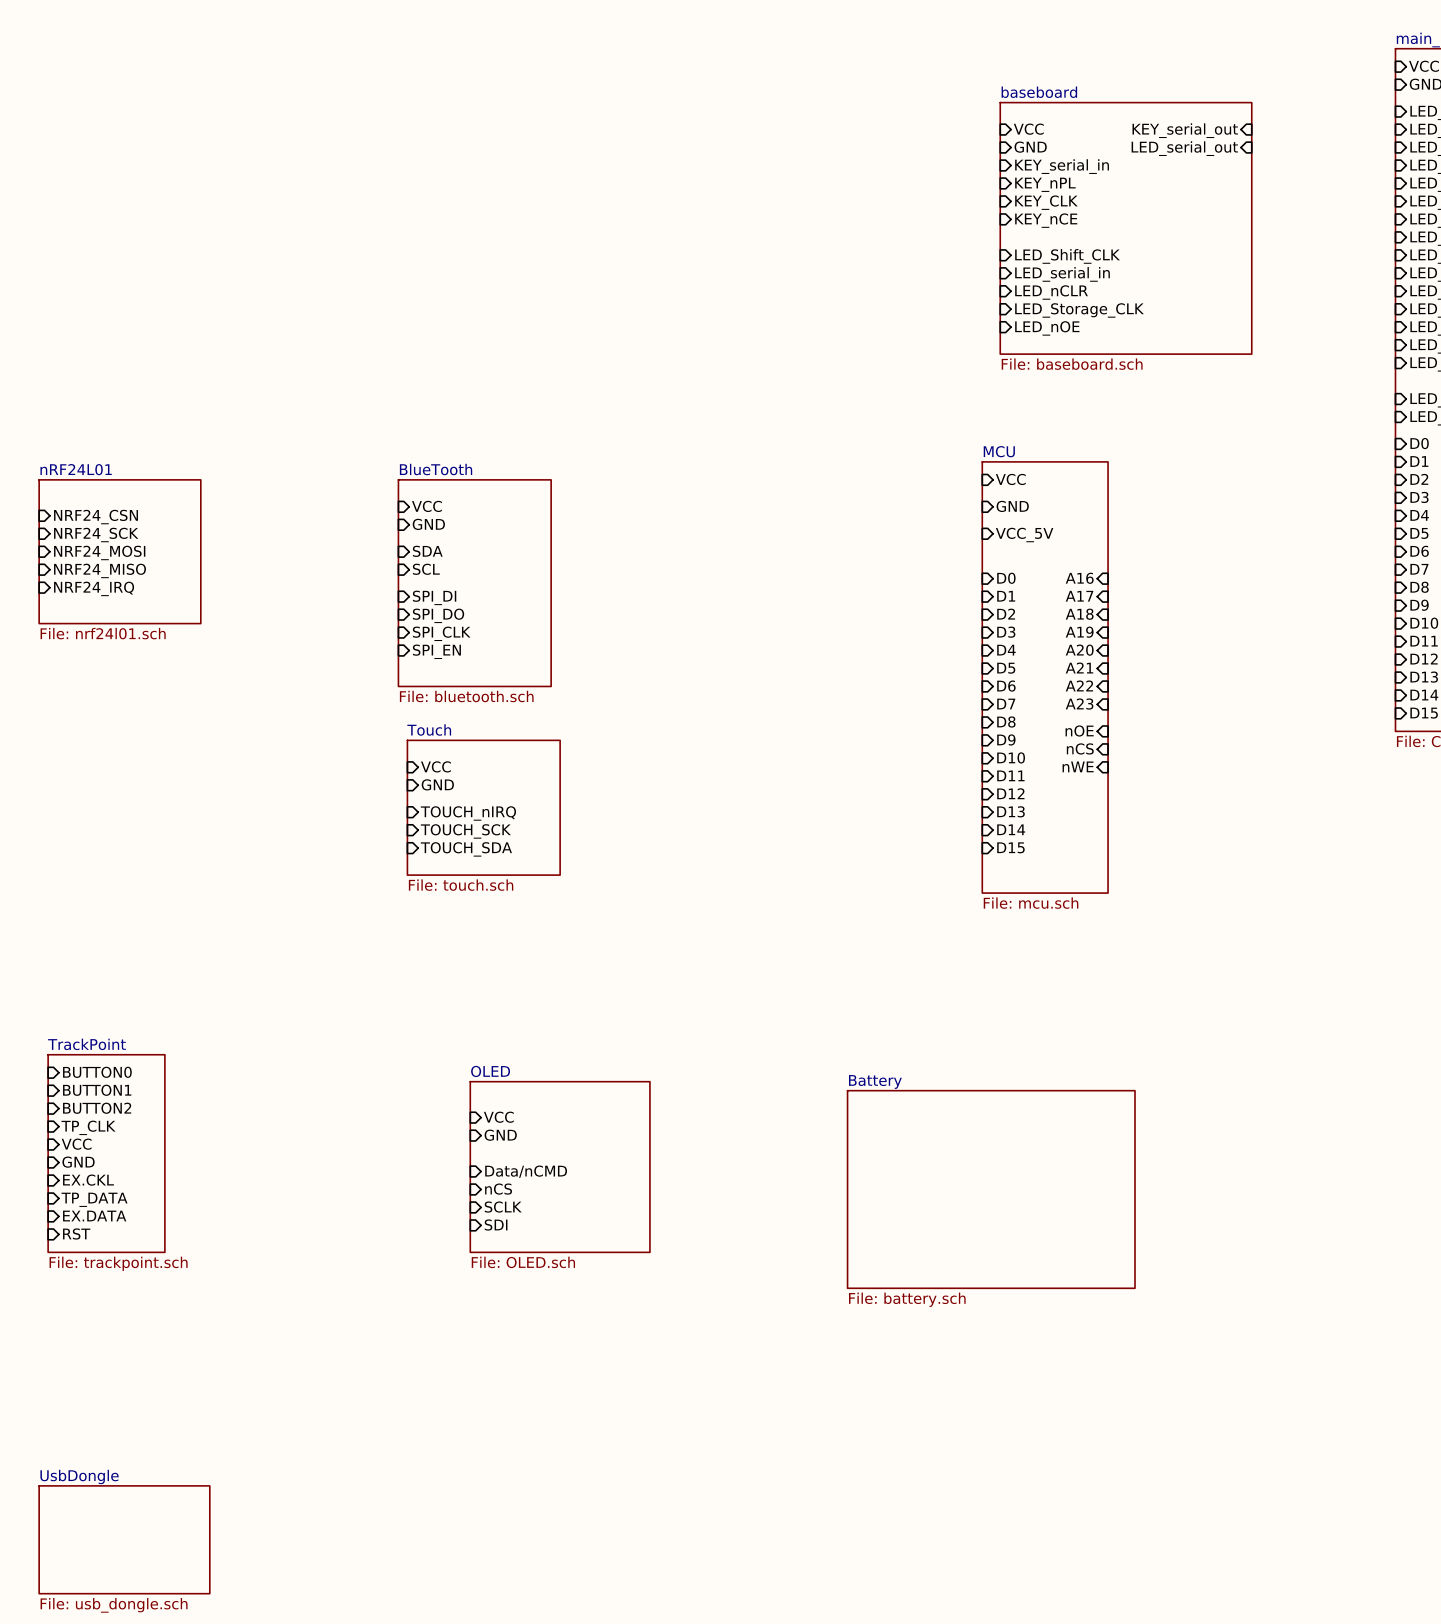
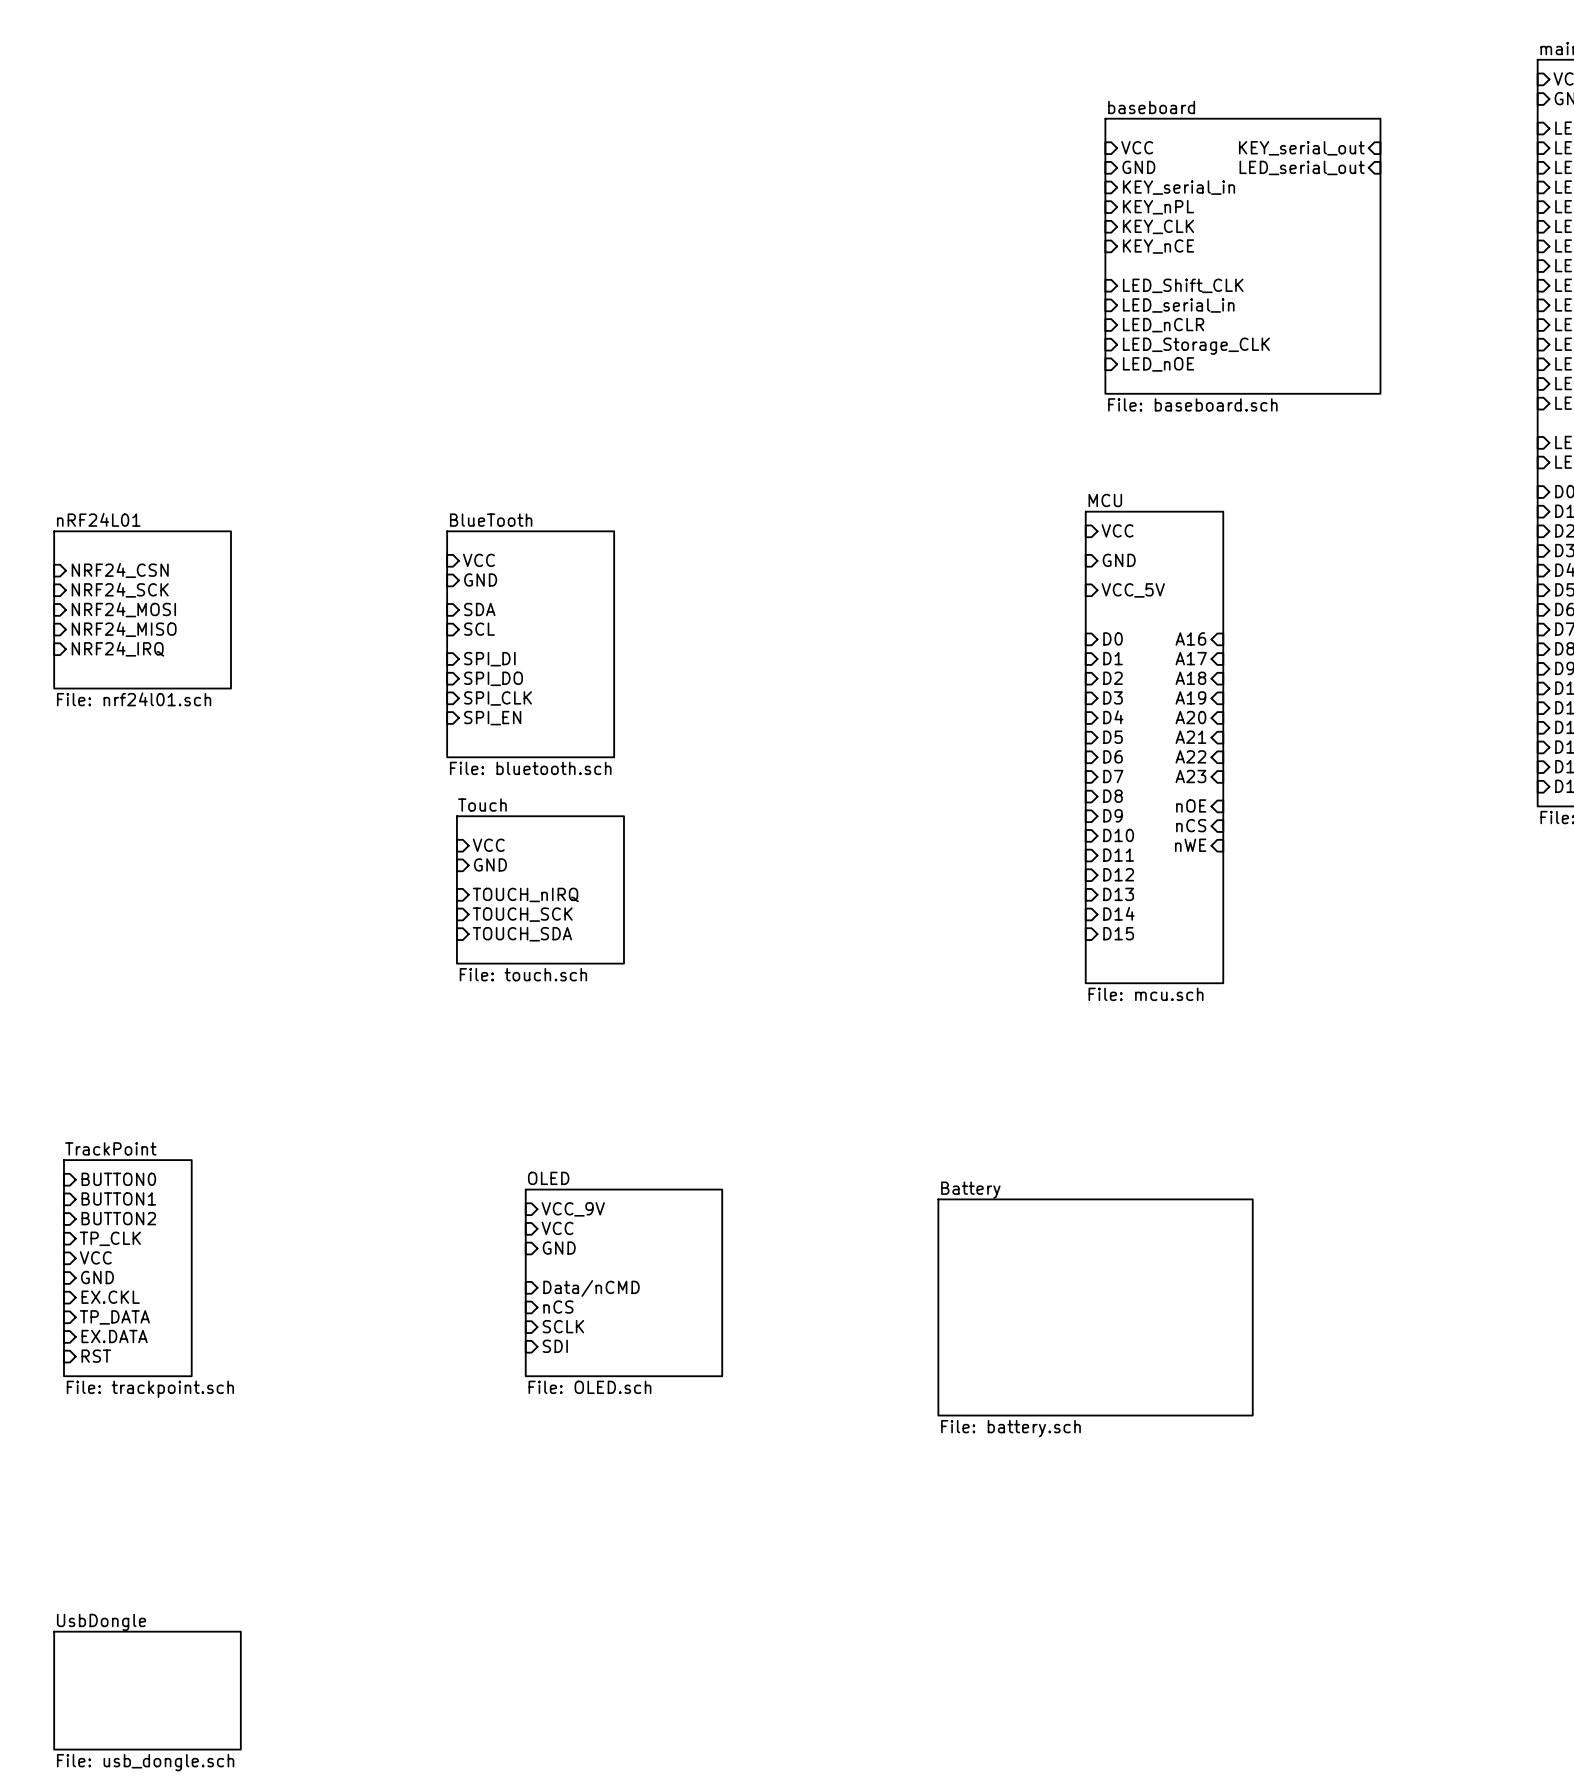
sheet pin: none -> VCC_9V (573, 1209)

